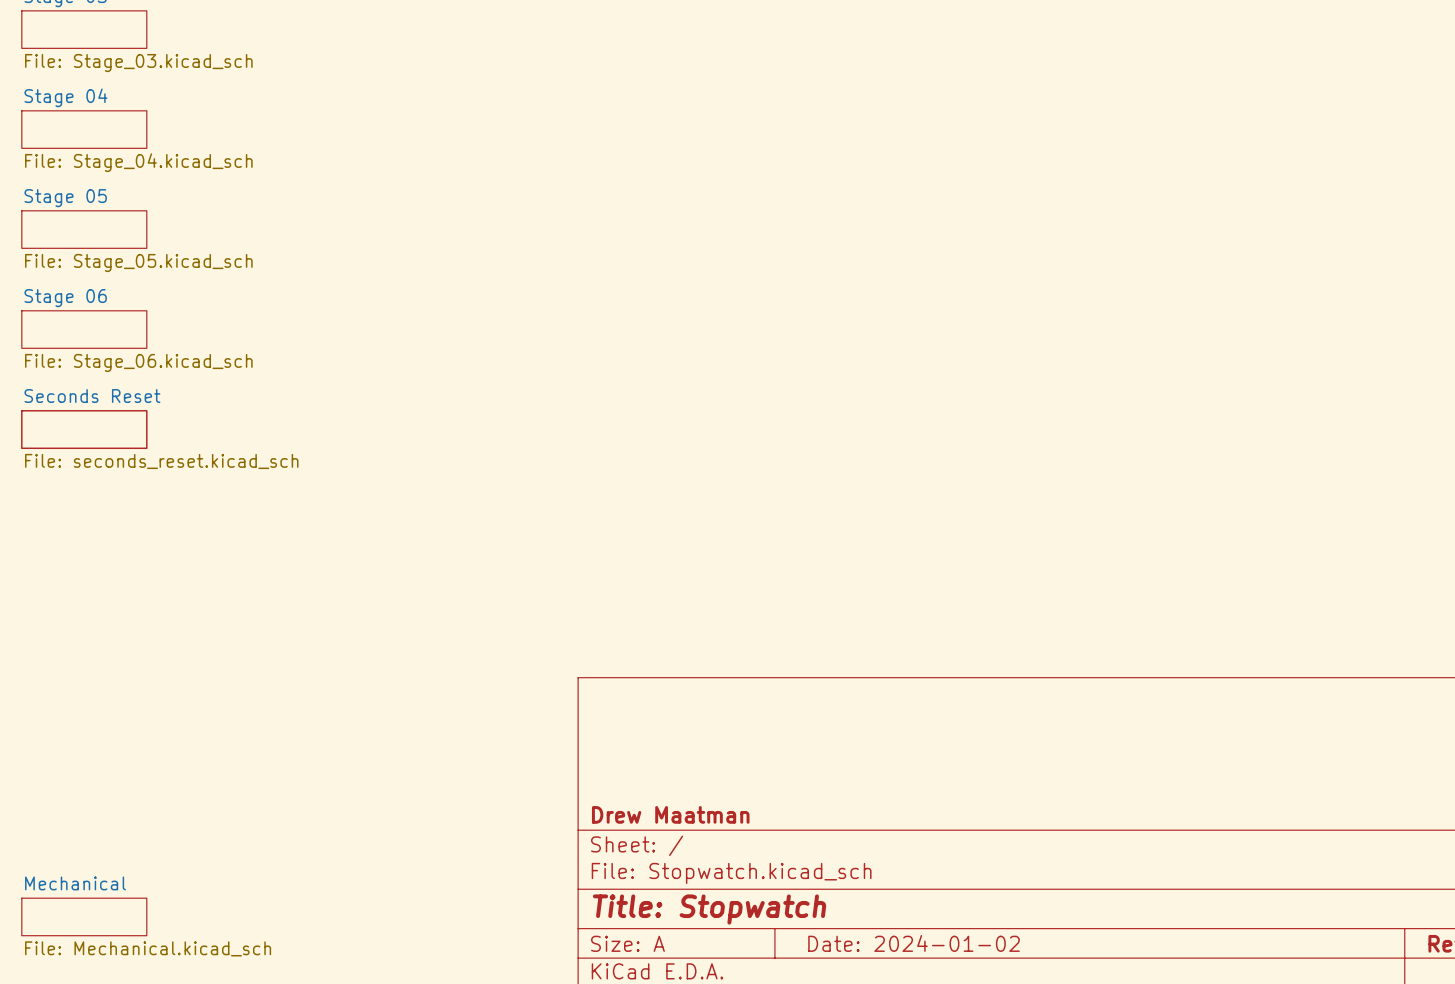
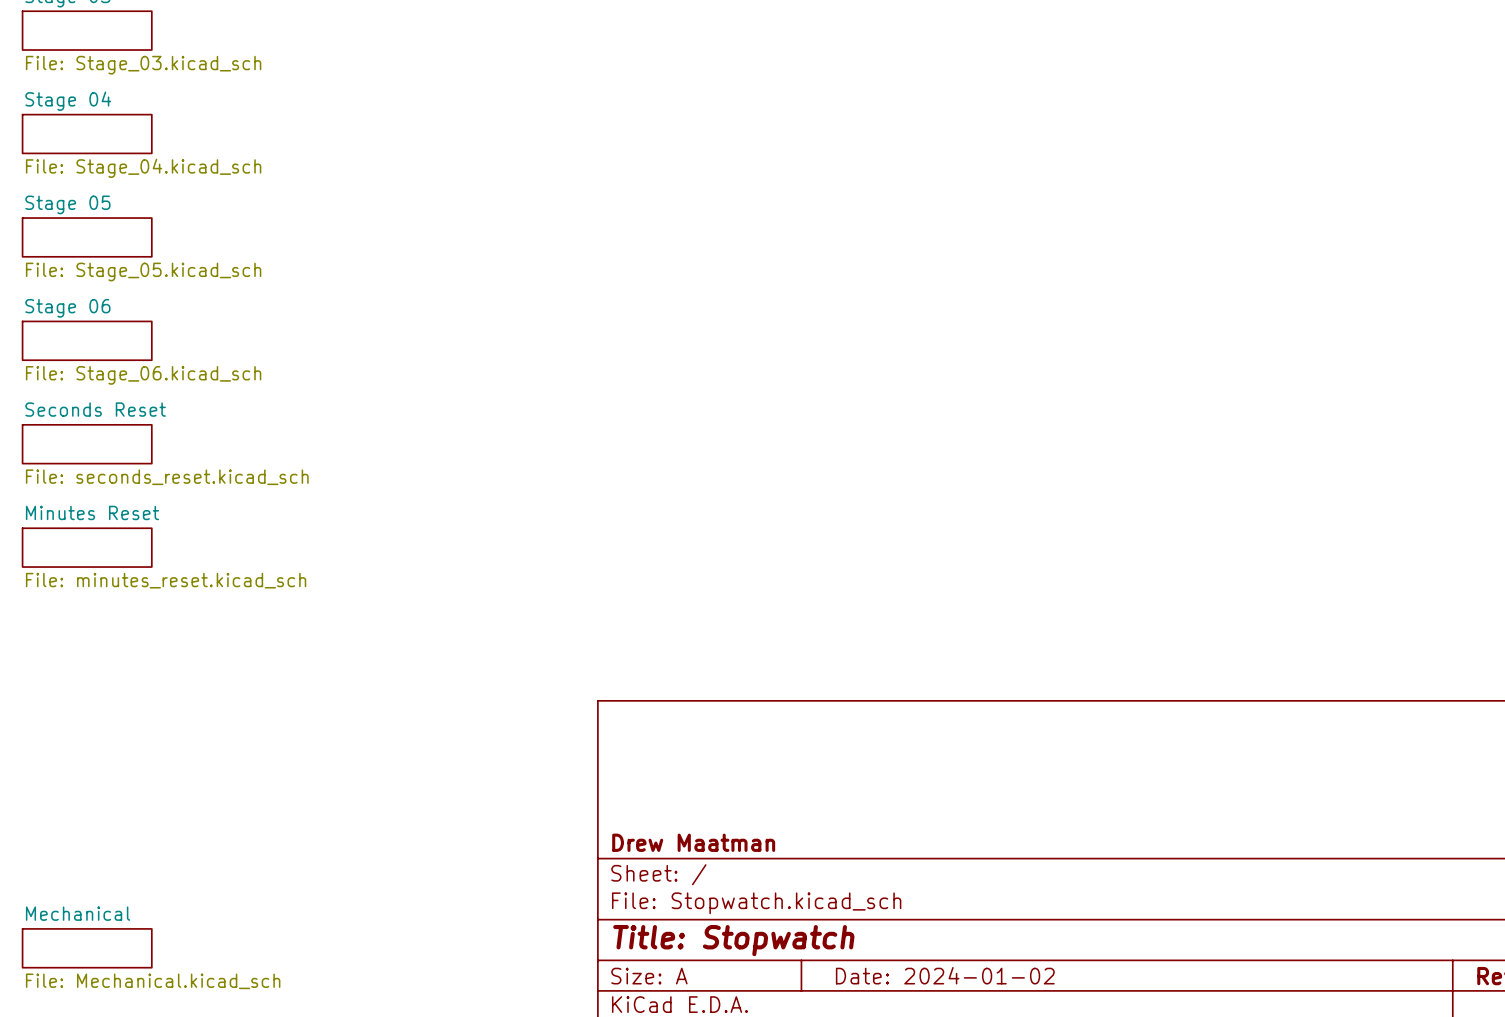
sheet Minutes Reset: none -> File: minutes_reset.kicad_sch (87, 547)

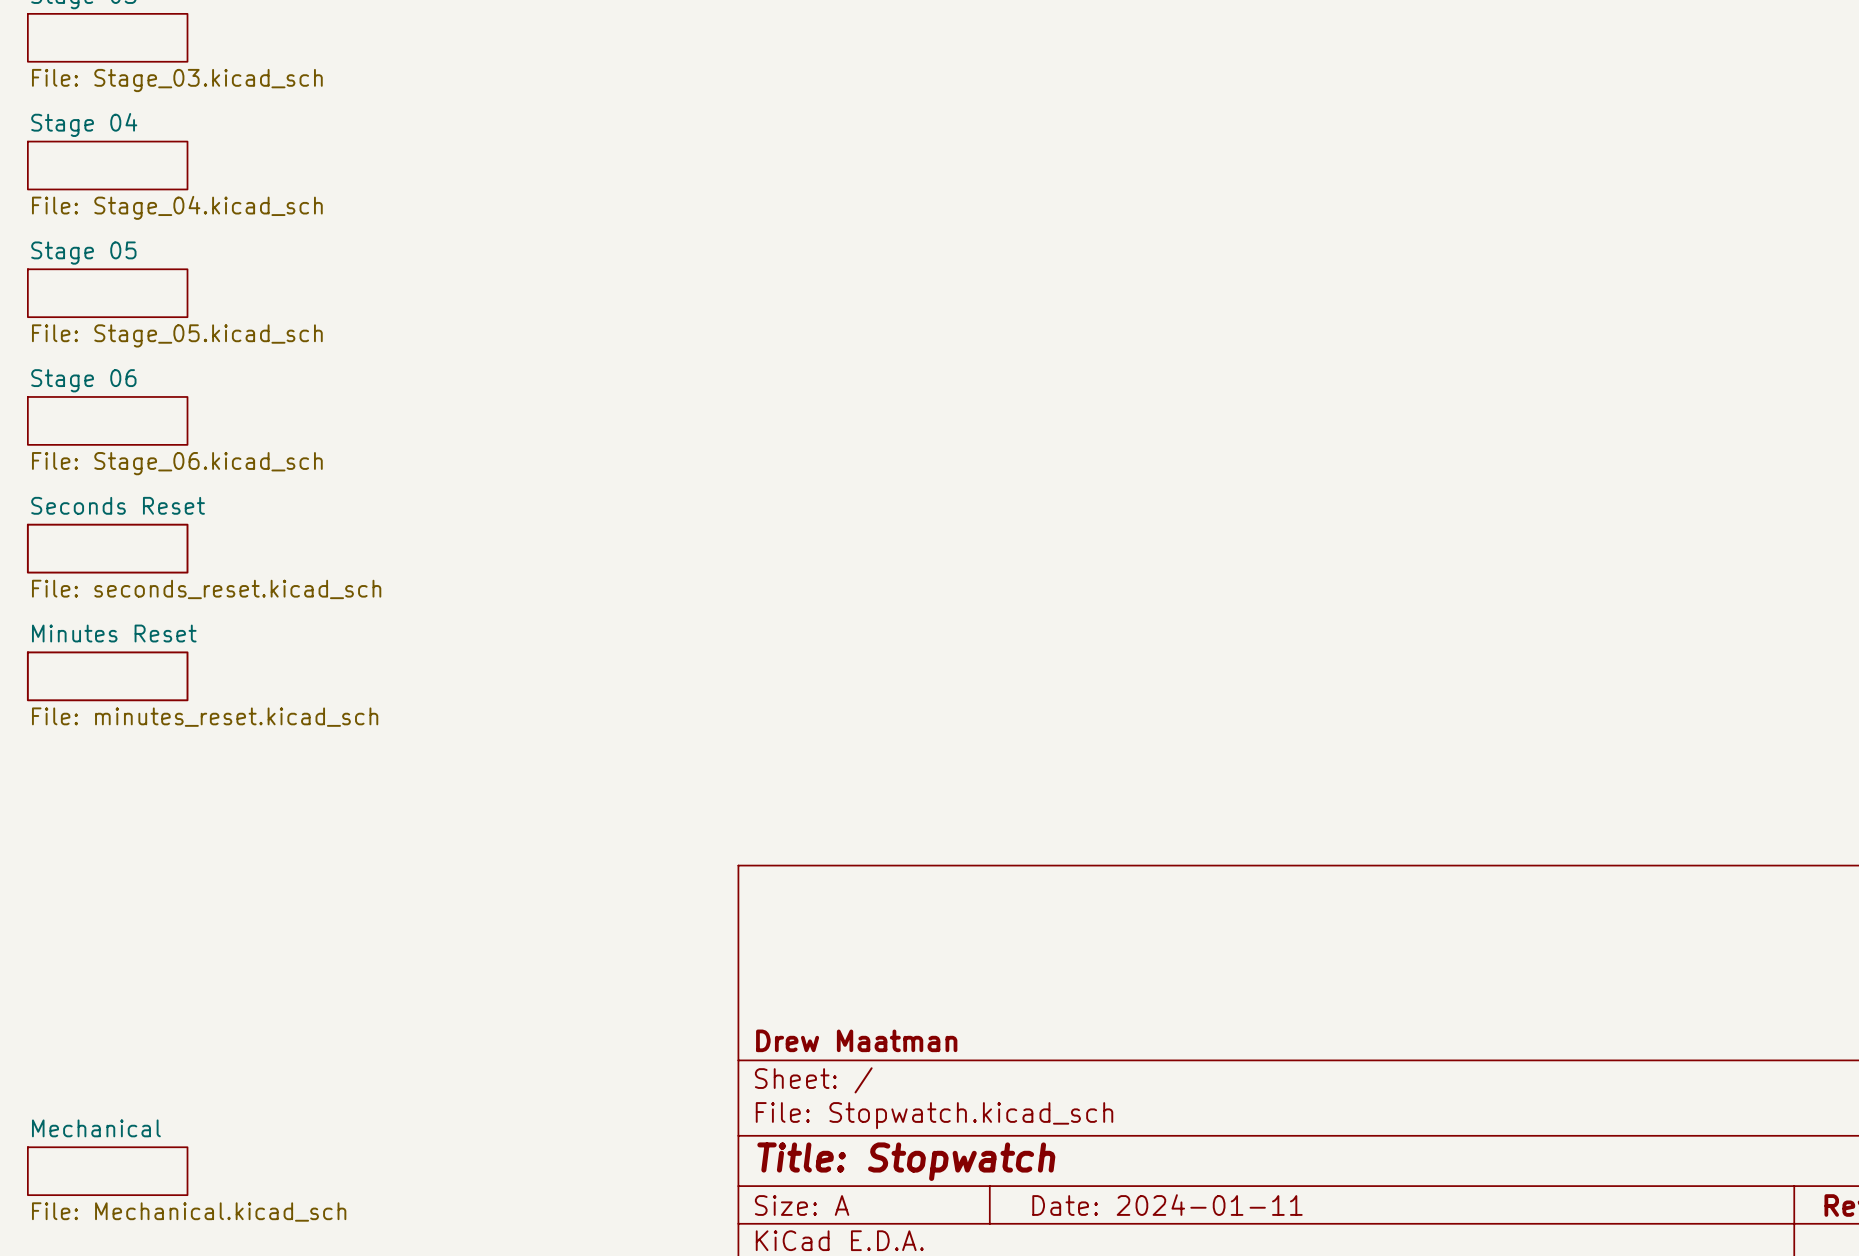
title block: Date: 2024-01-02 (945, 975) -> Date: 2024-01-11 (1167, 1205)

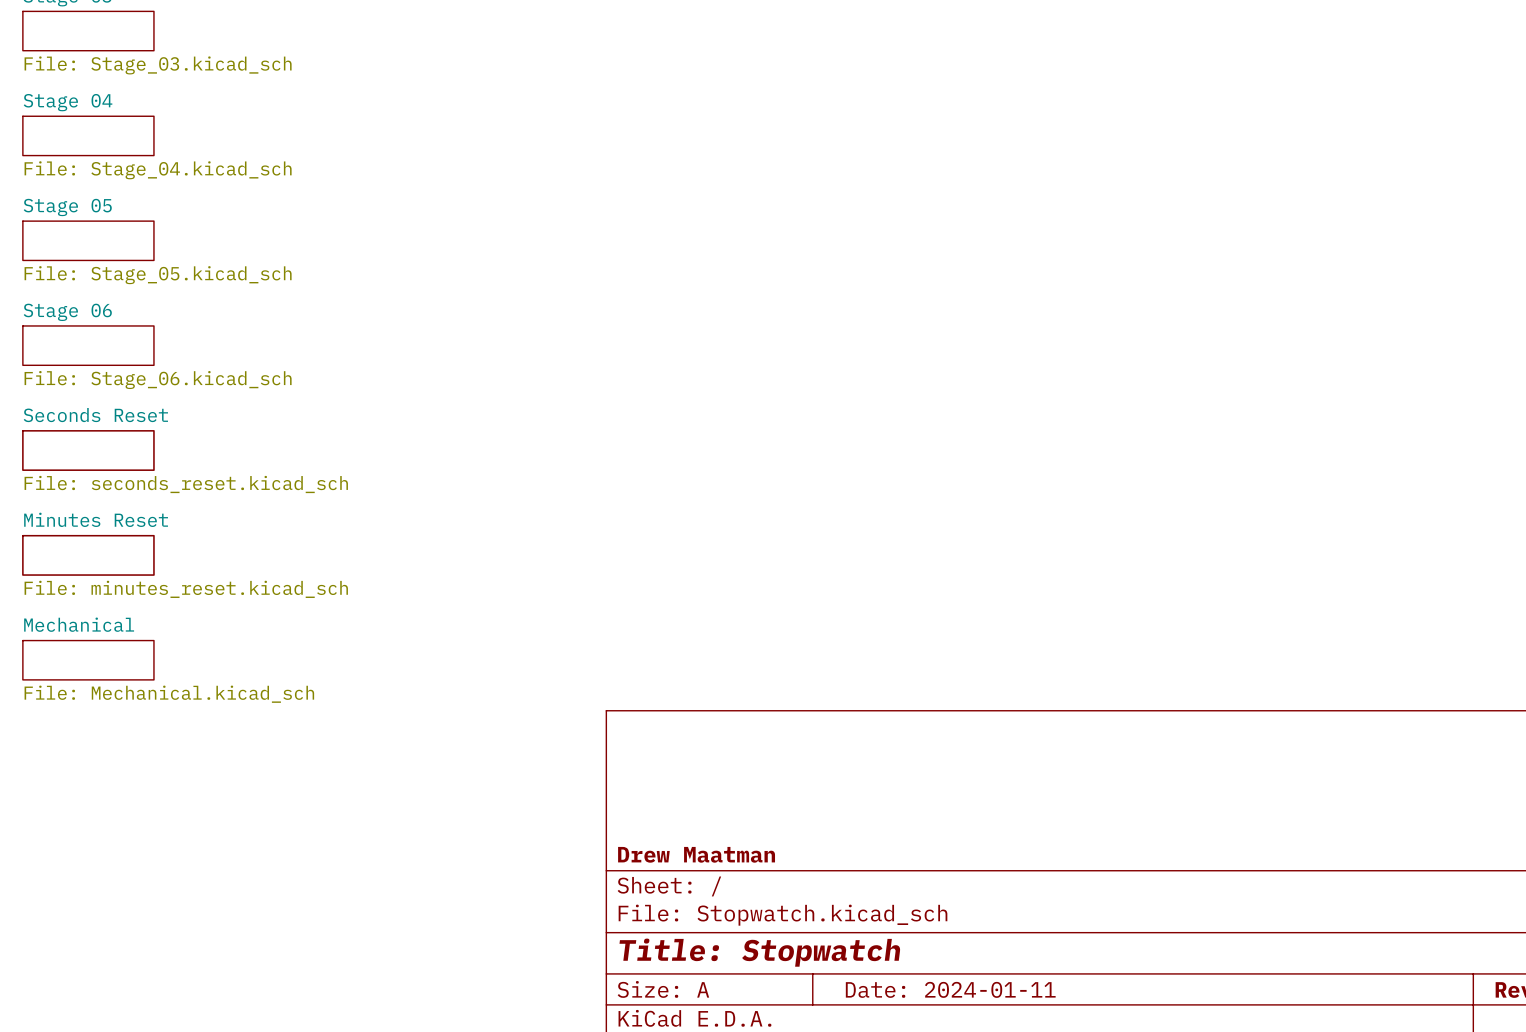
sheet Mechanical: none -> File: Mechanical.kicad_sch (88, 660)
sheet Mechanical: File: Mechanical.kicad_sch (107, 1171) -> none

